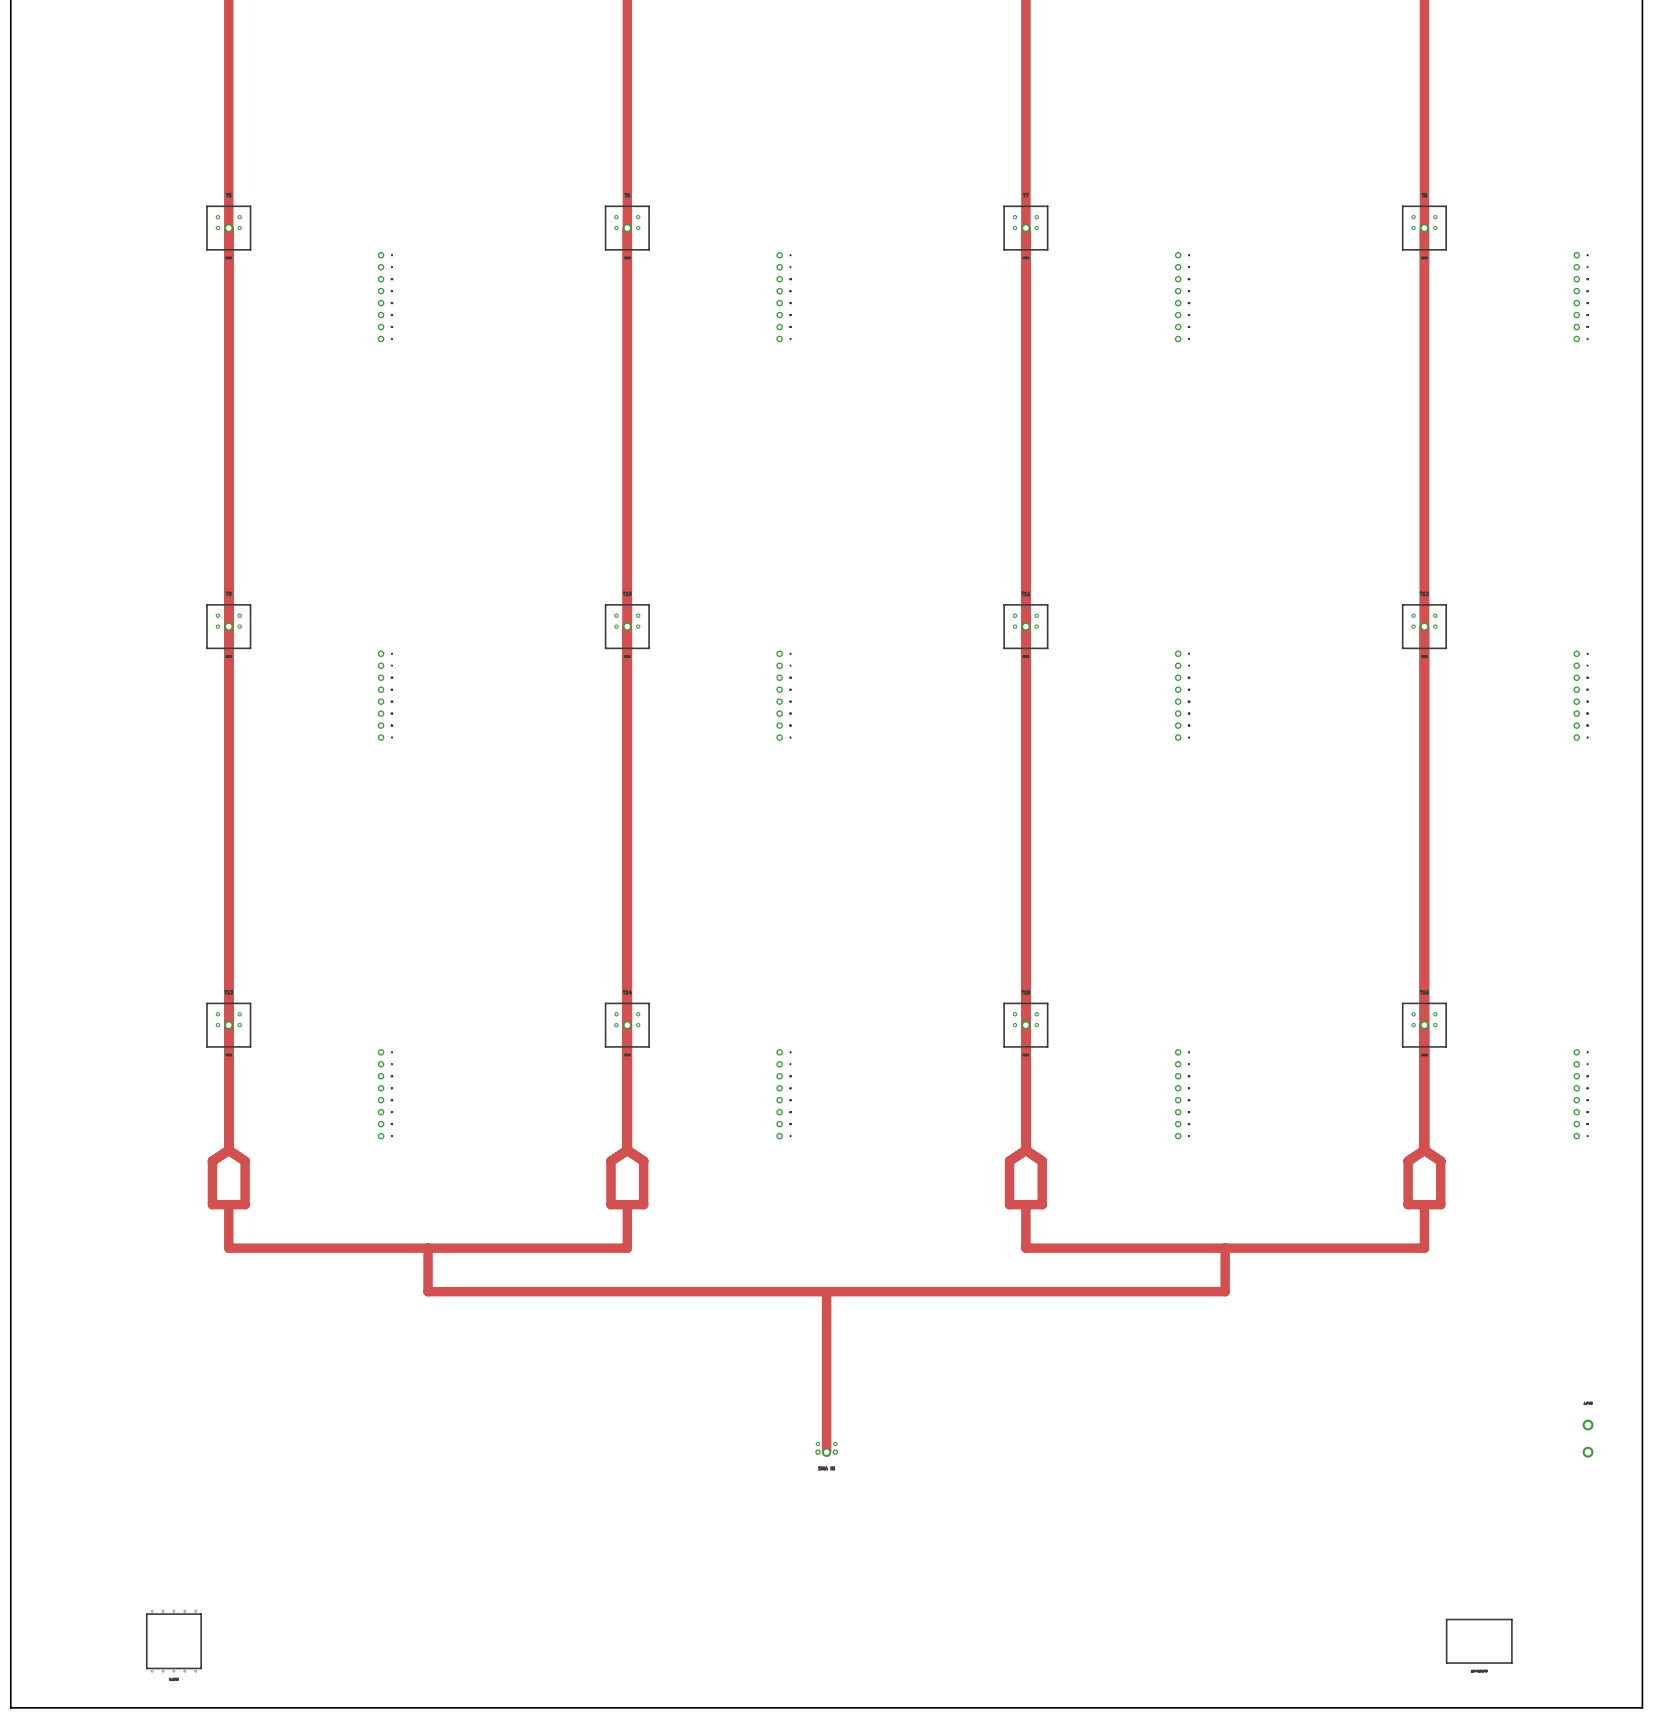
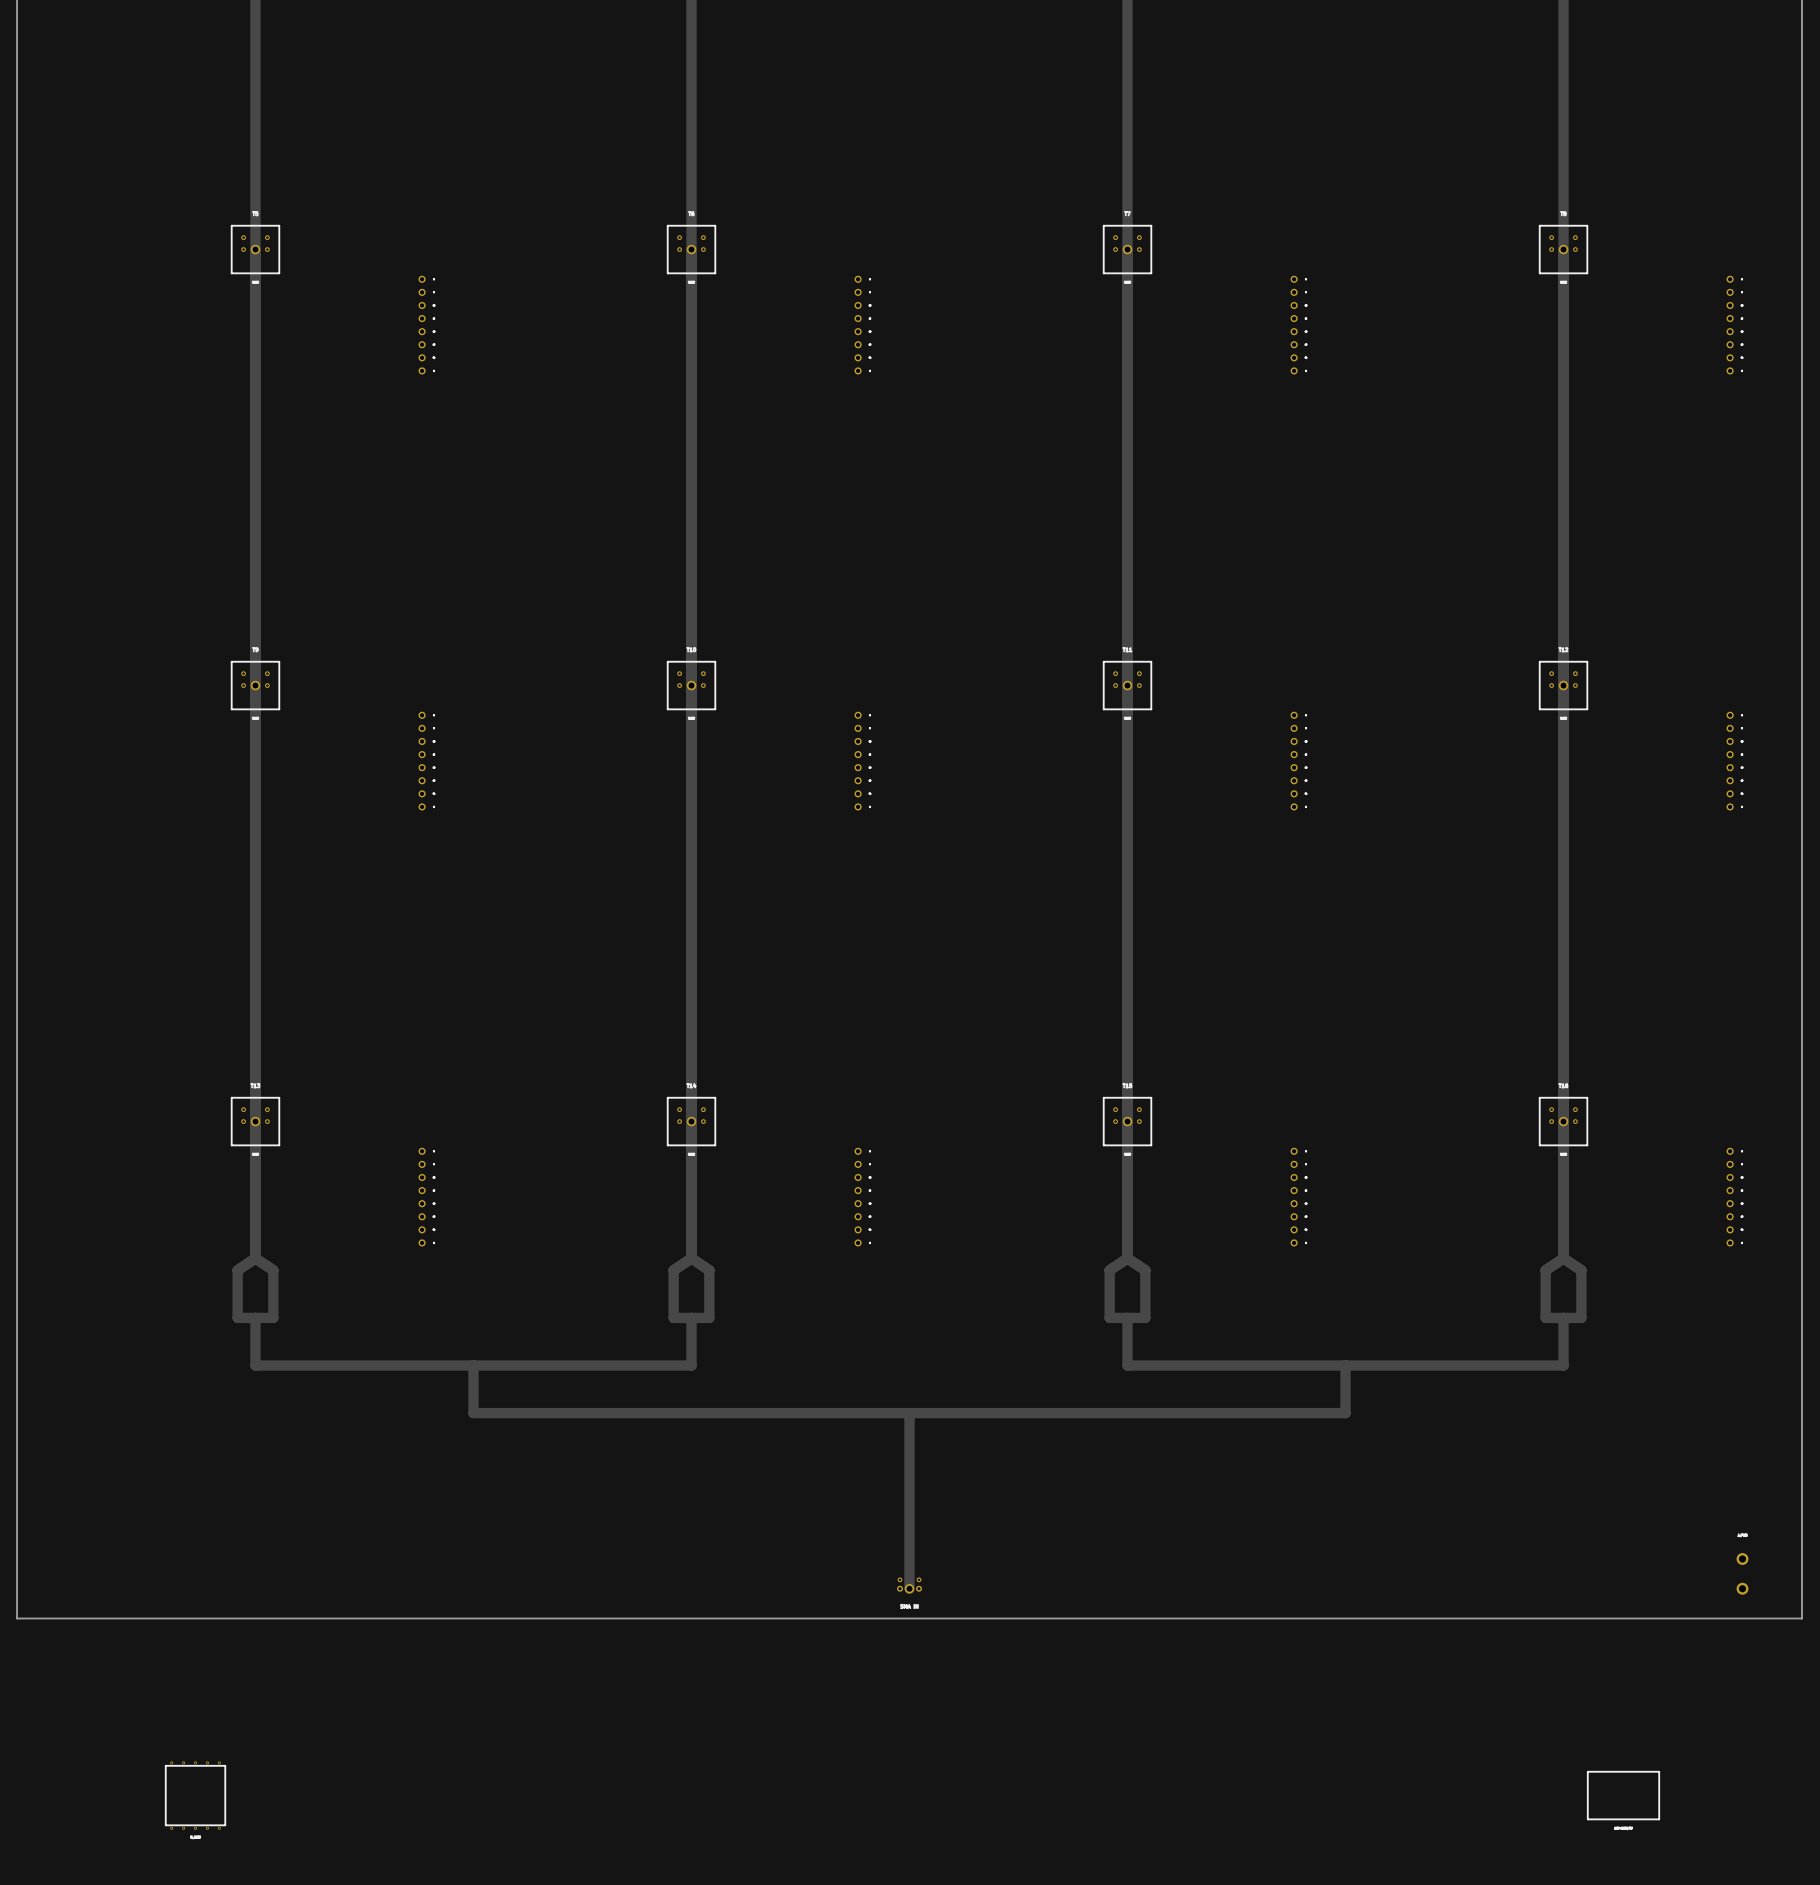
board edge: (10, 1479) (10, 1707) (1642, 1707) (1642, 1479) -> (17, 1618) (1802, 1618)

